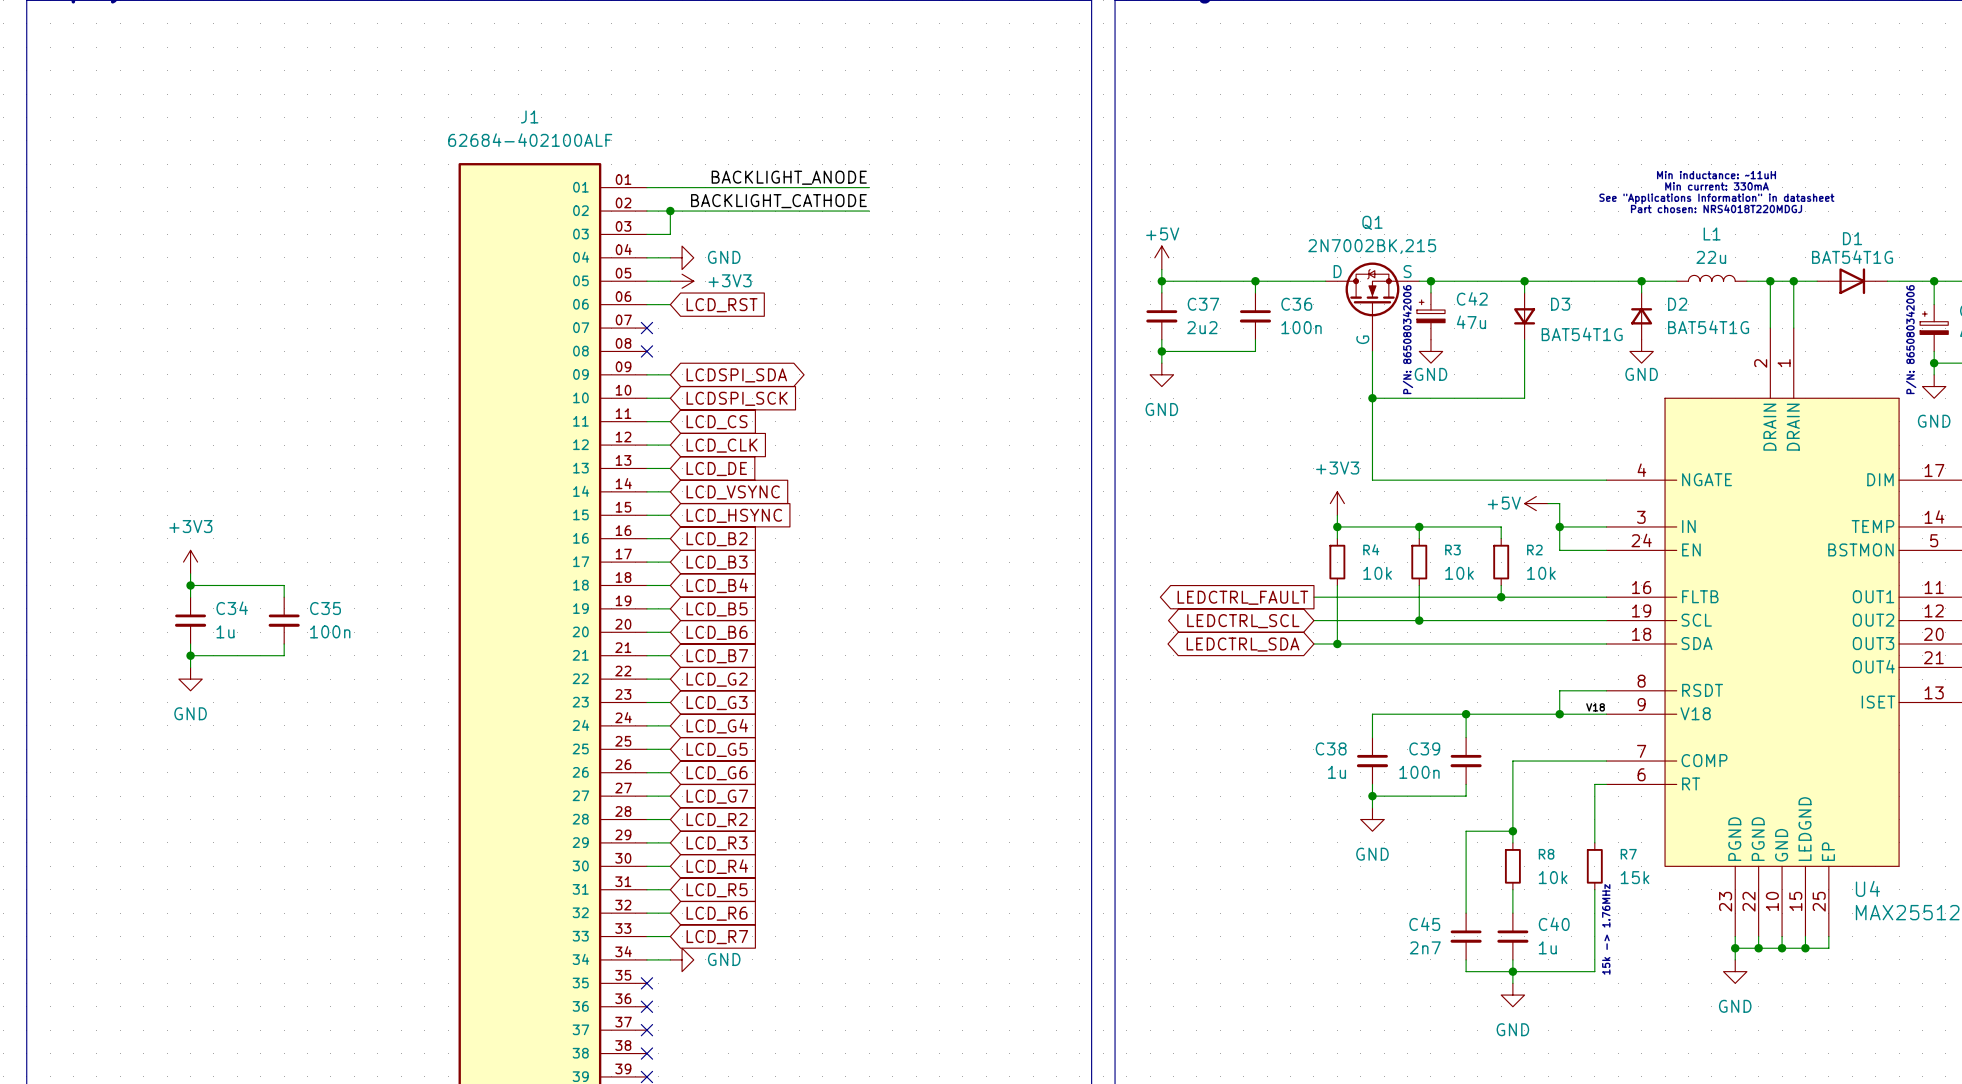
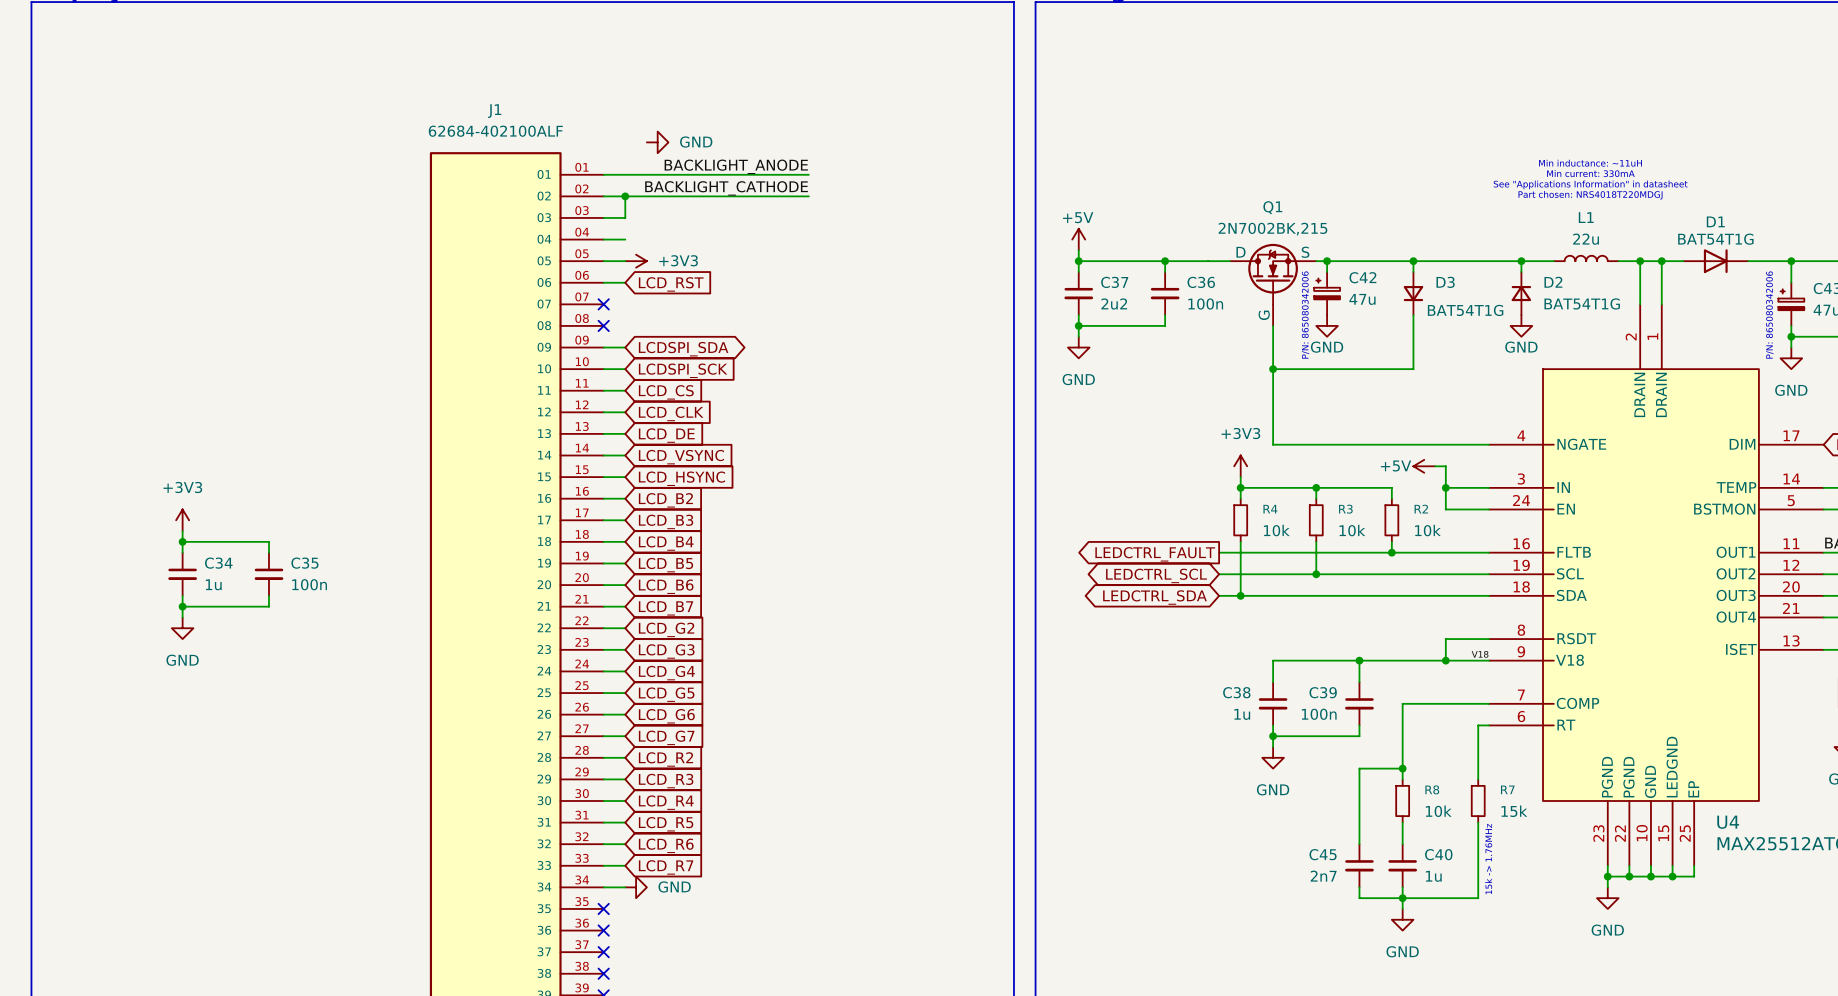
power symbol position: GND (682, 257) -> GND (657, 142)

